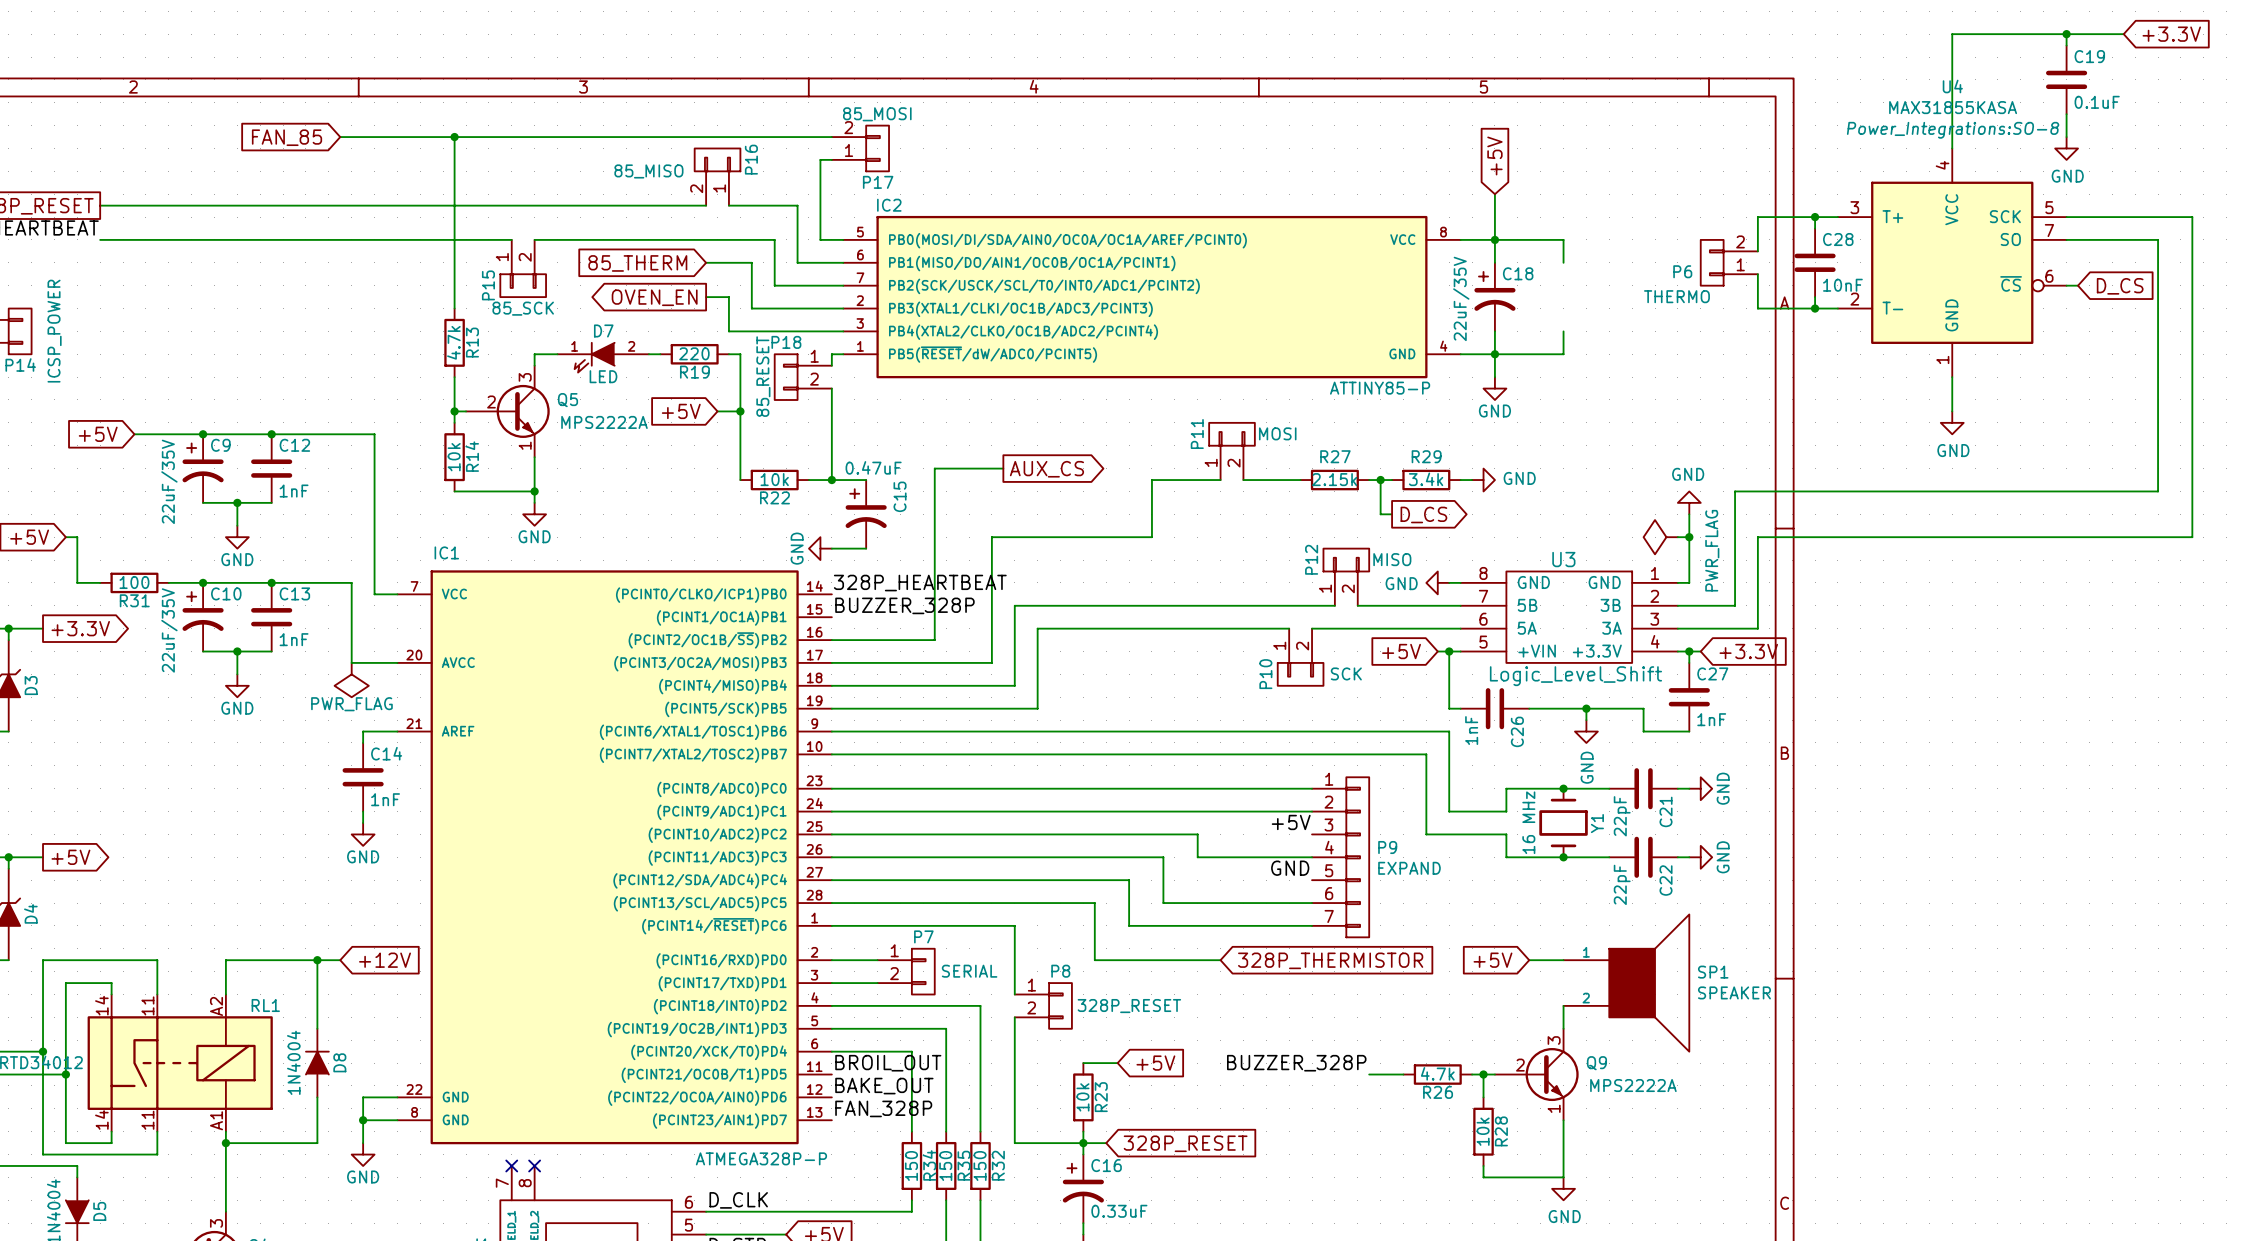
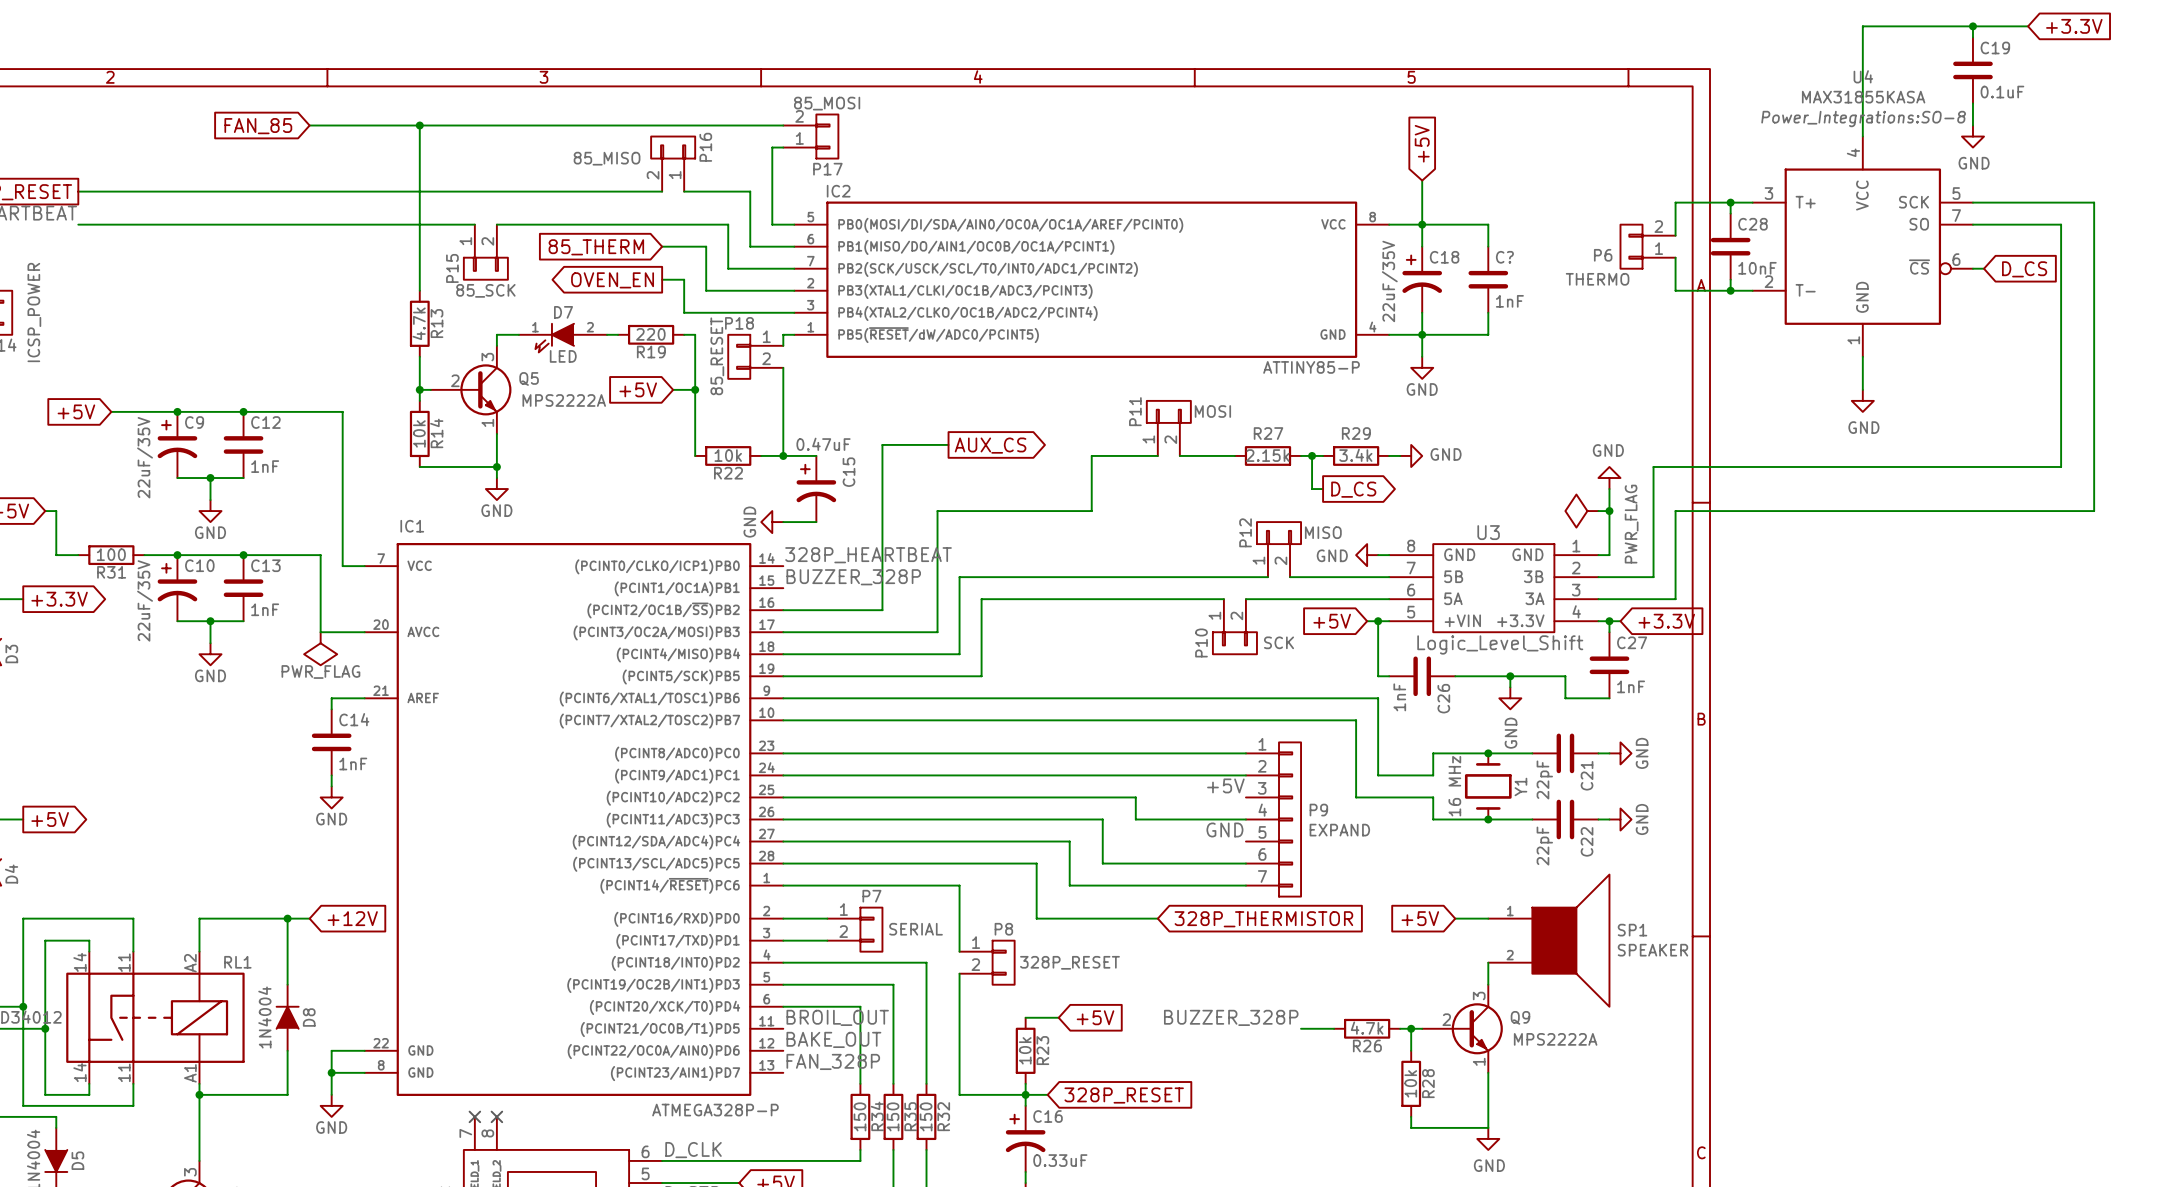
C?: none -> 1nF (1488, 279)

